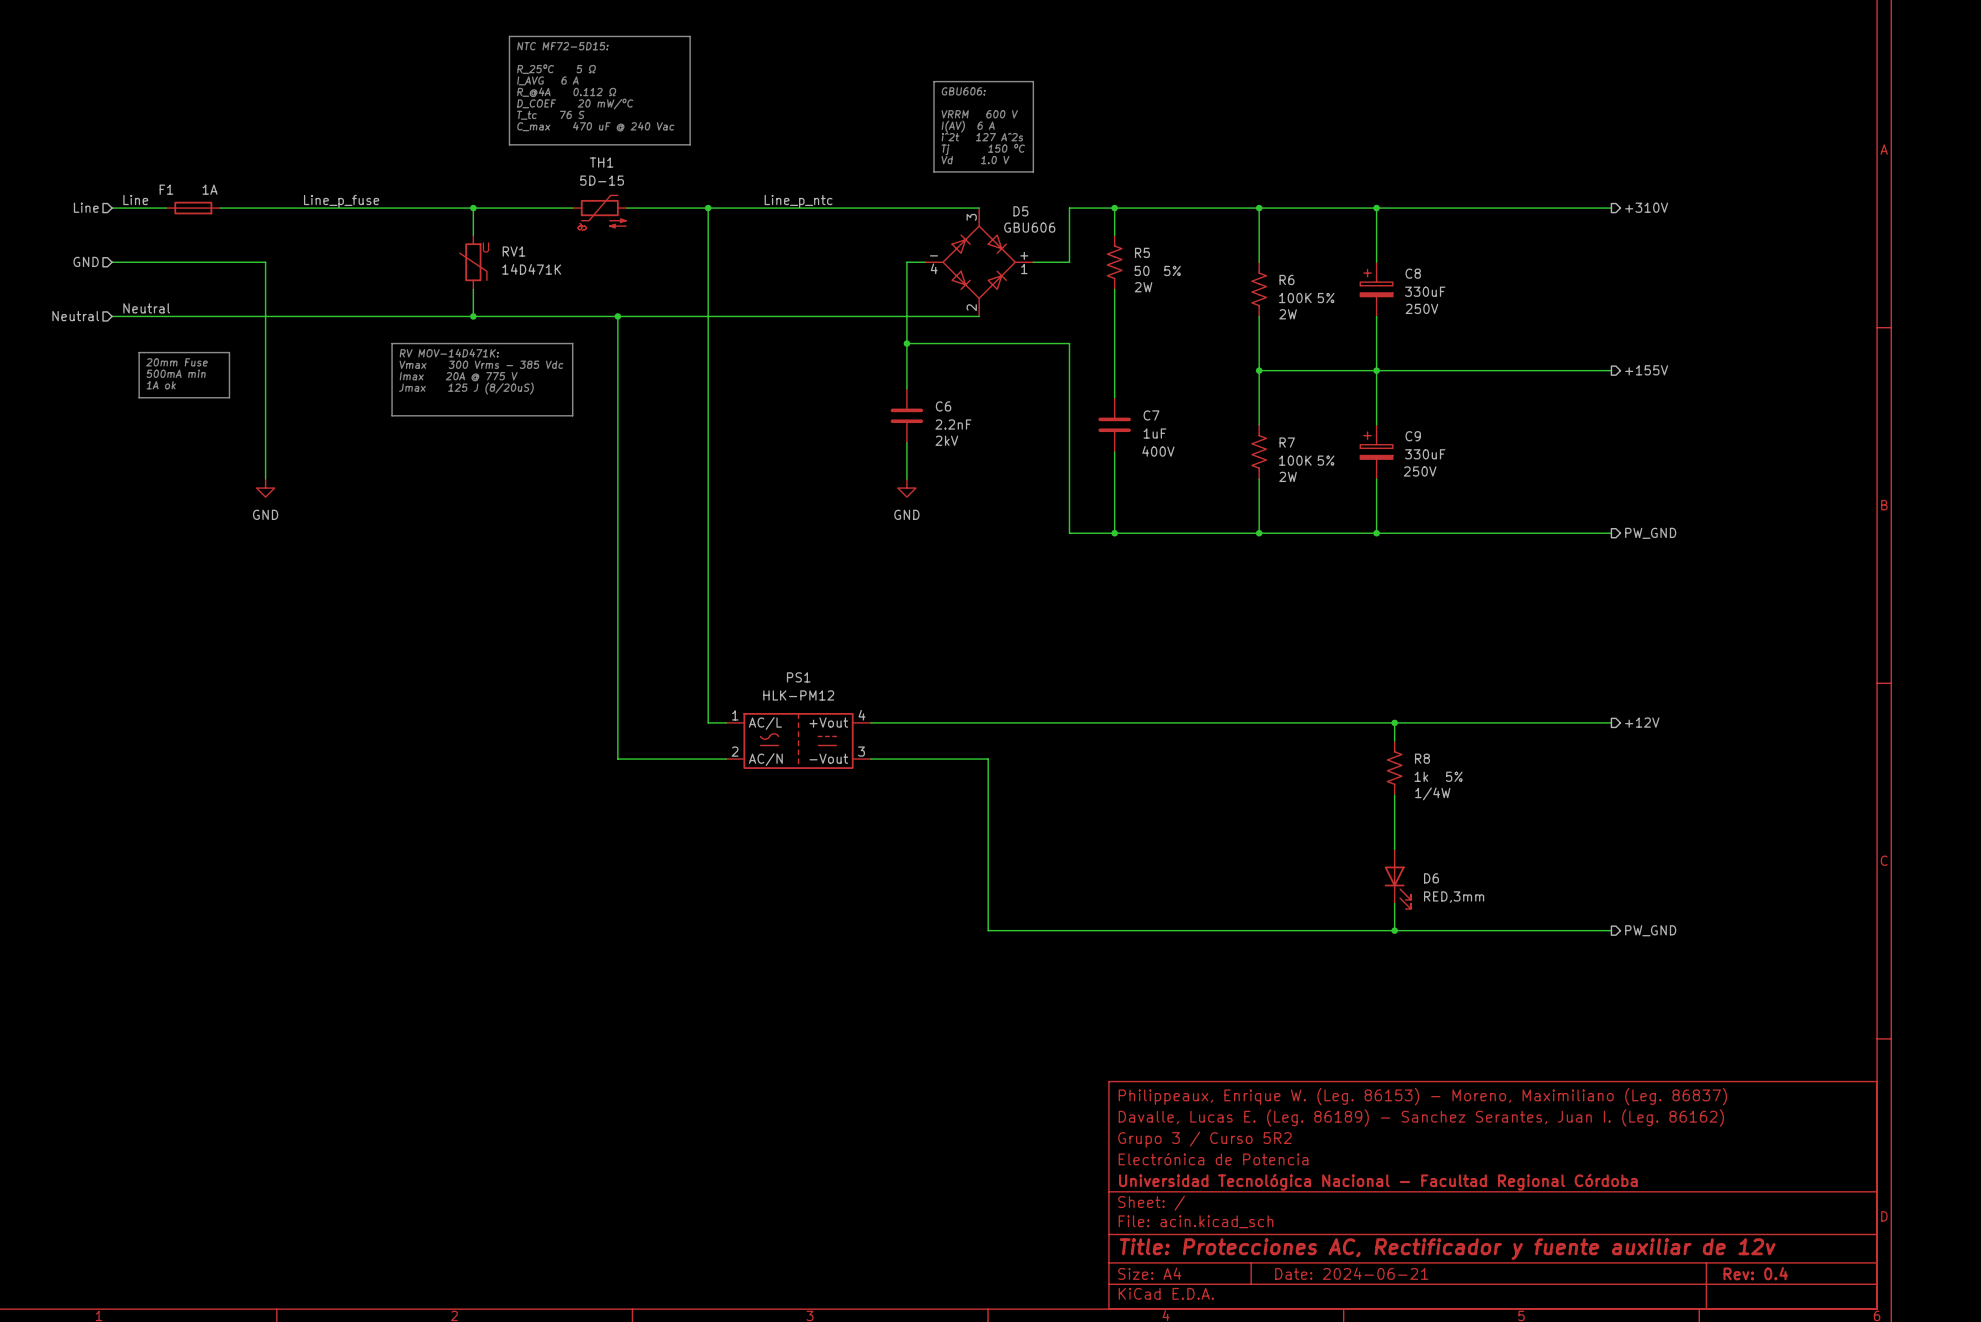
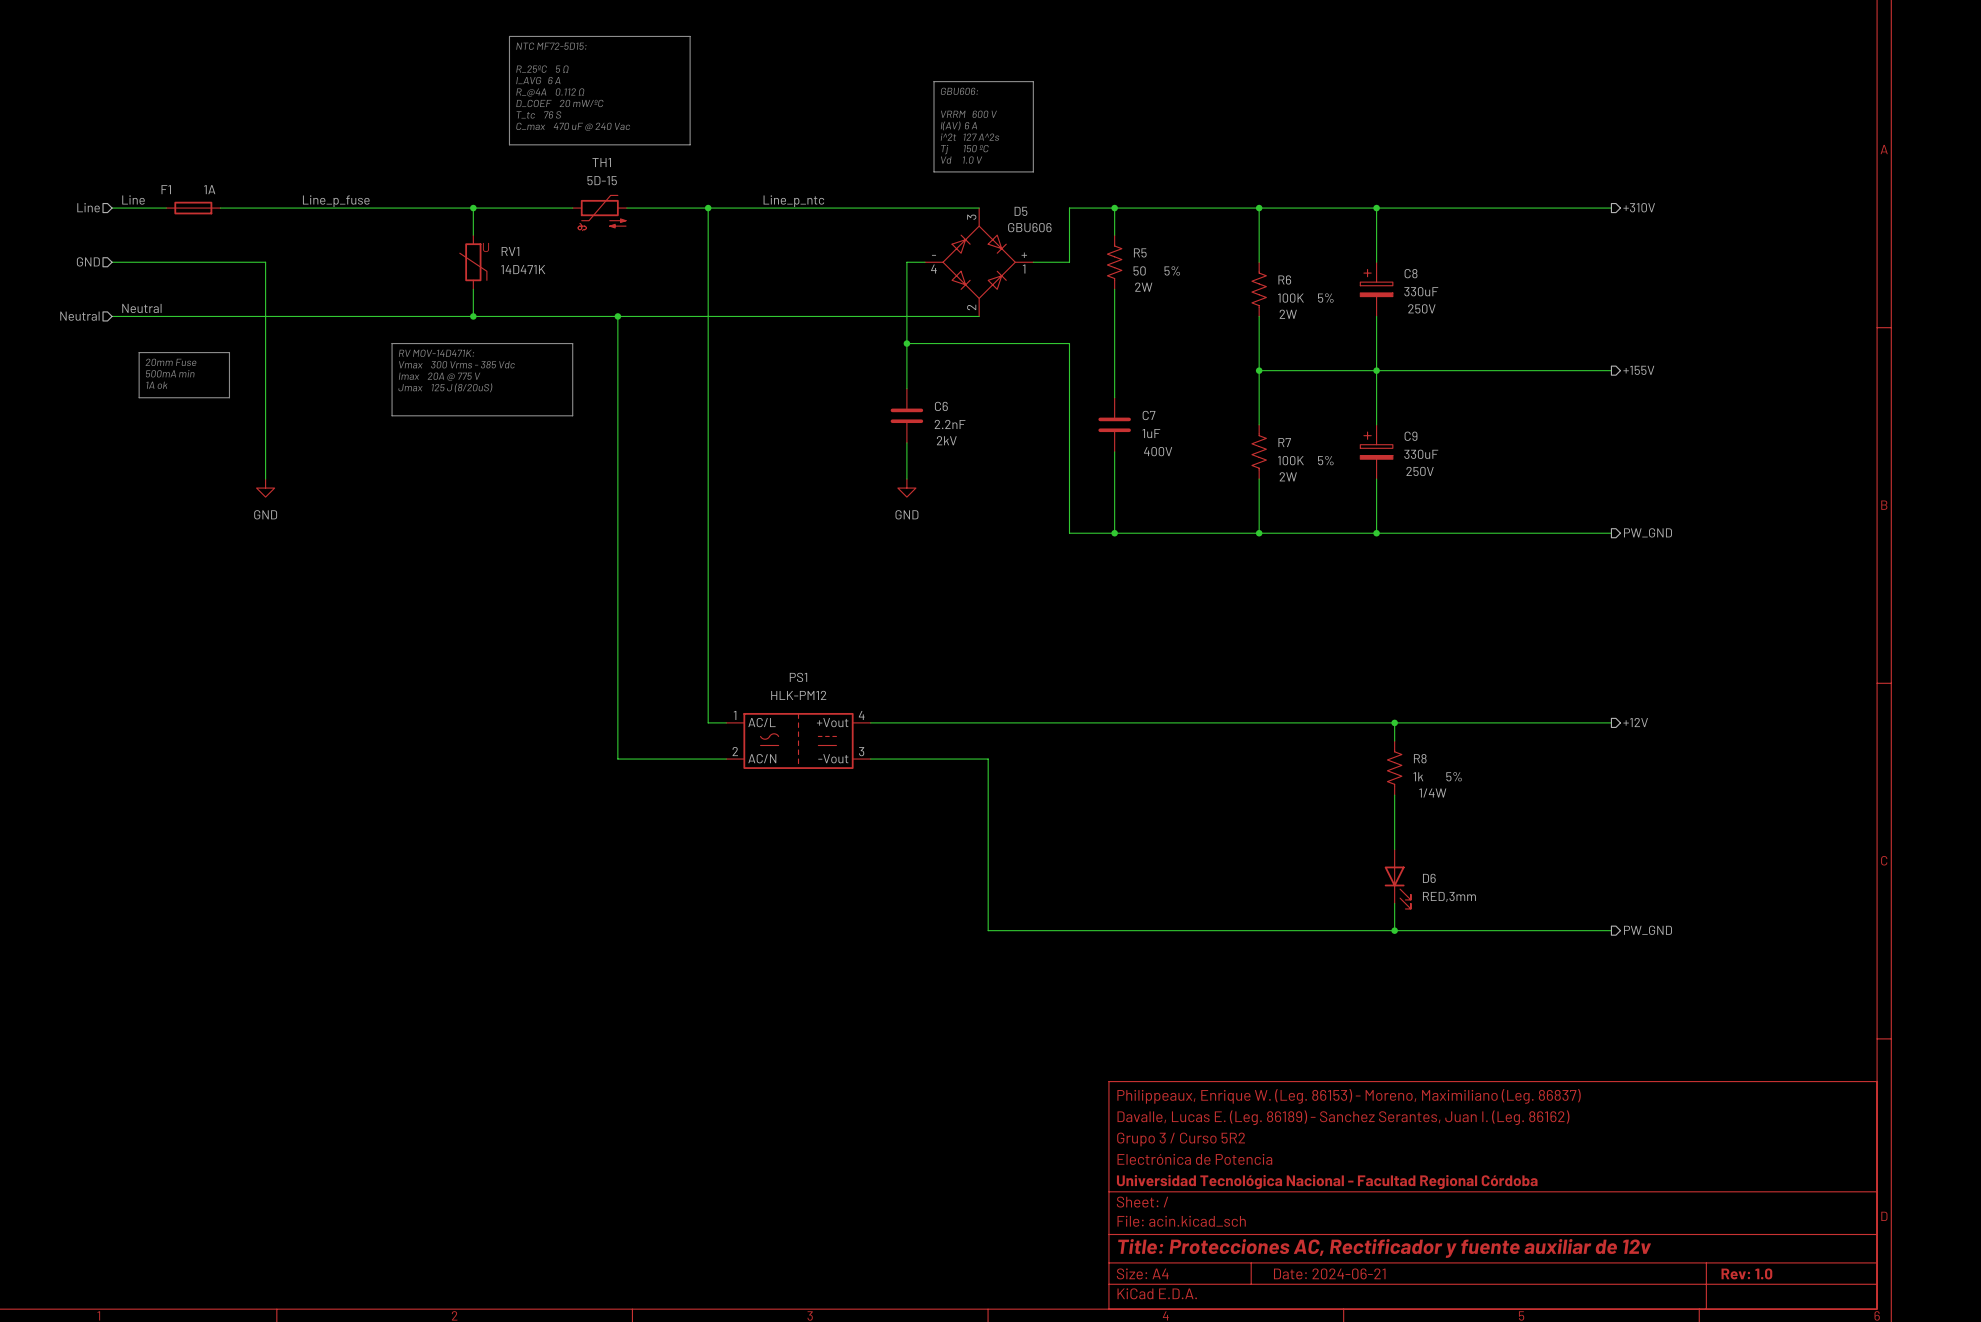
title block: Rev: 0.4 (1755, 1273) -> Rev: 1.0 (1746, 1273)

